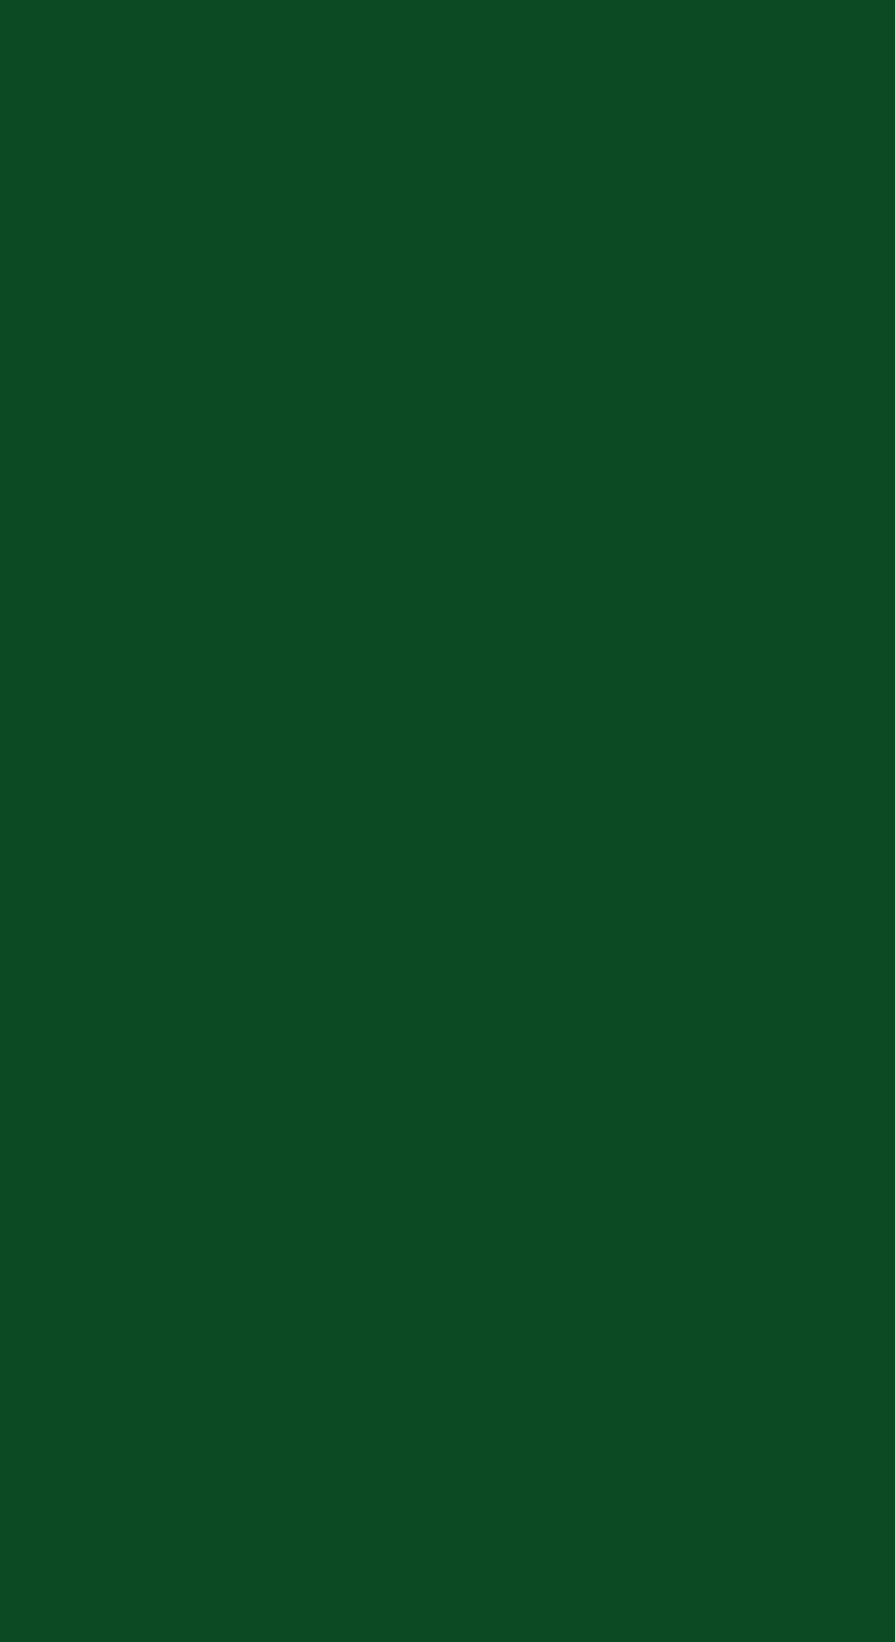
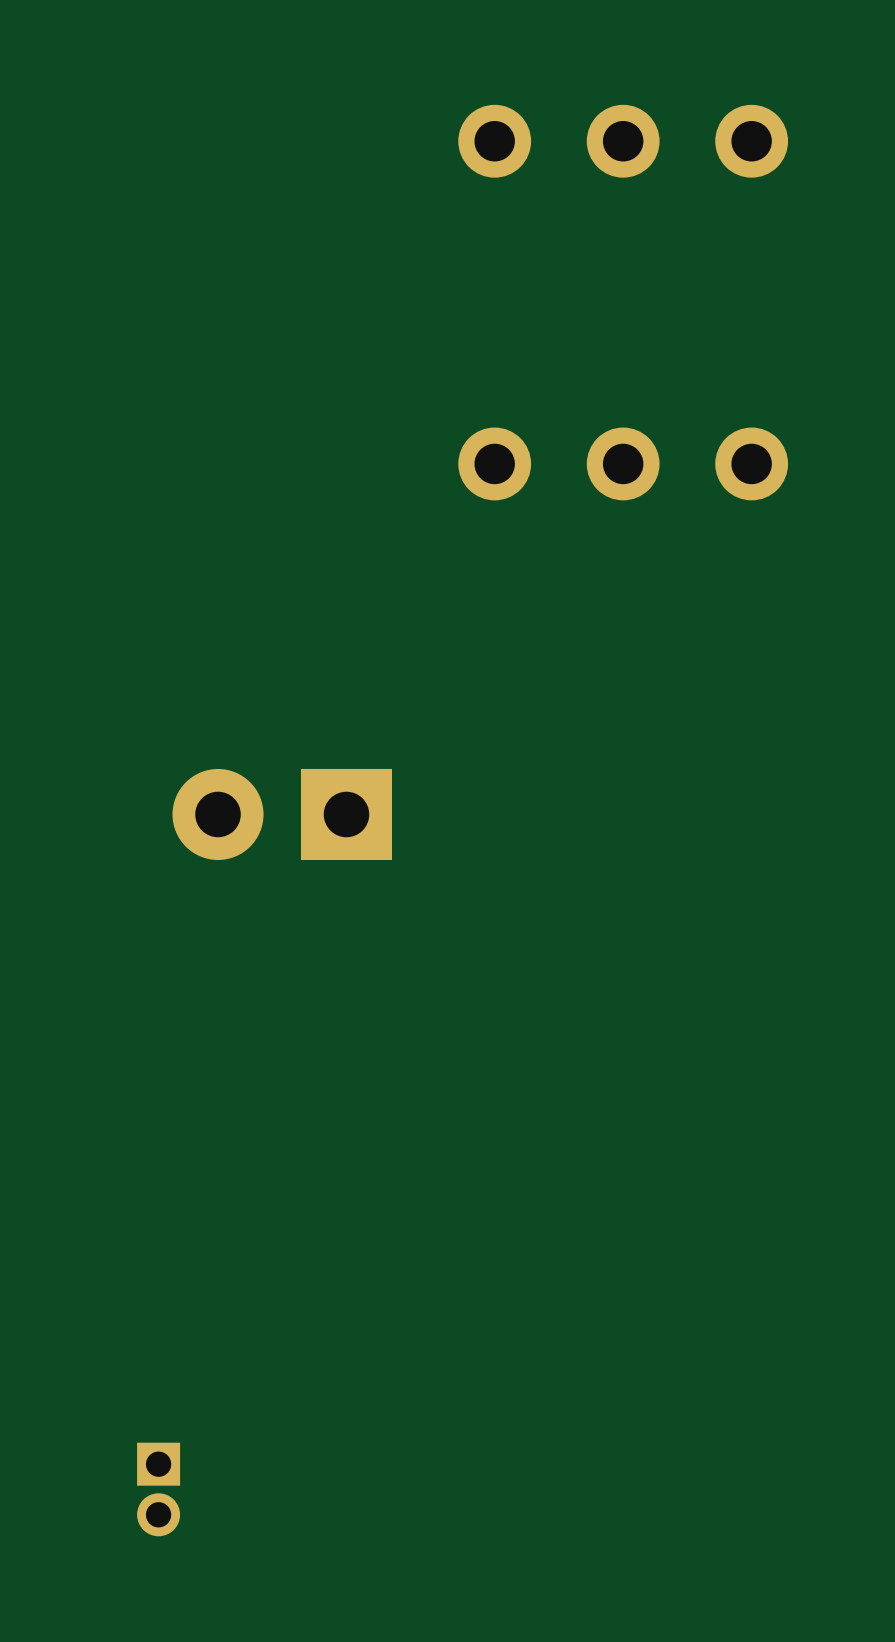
part: none -> (623, 141)
part: none -> (623, 463)
part: none -> (282, 814)
part: none -> (158, 1489)

